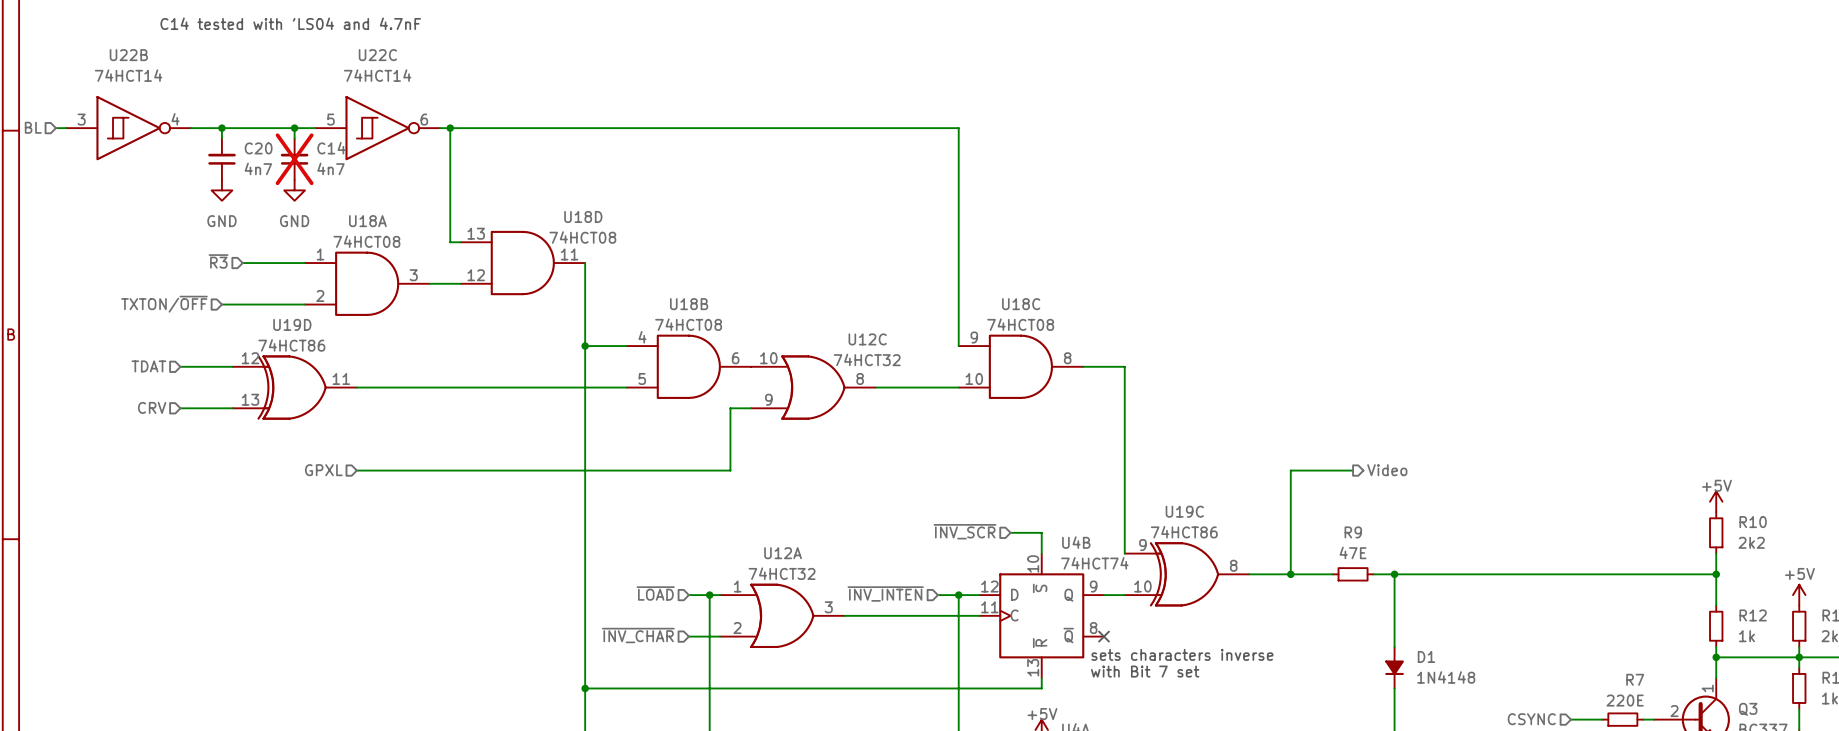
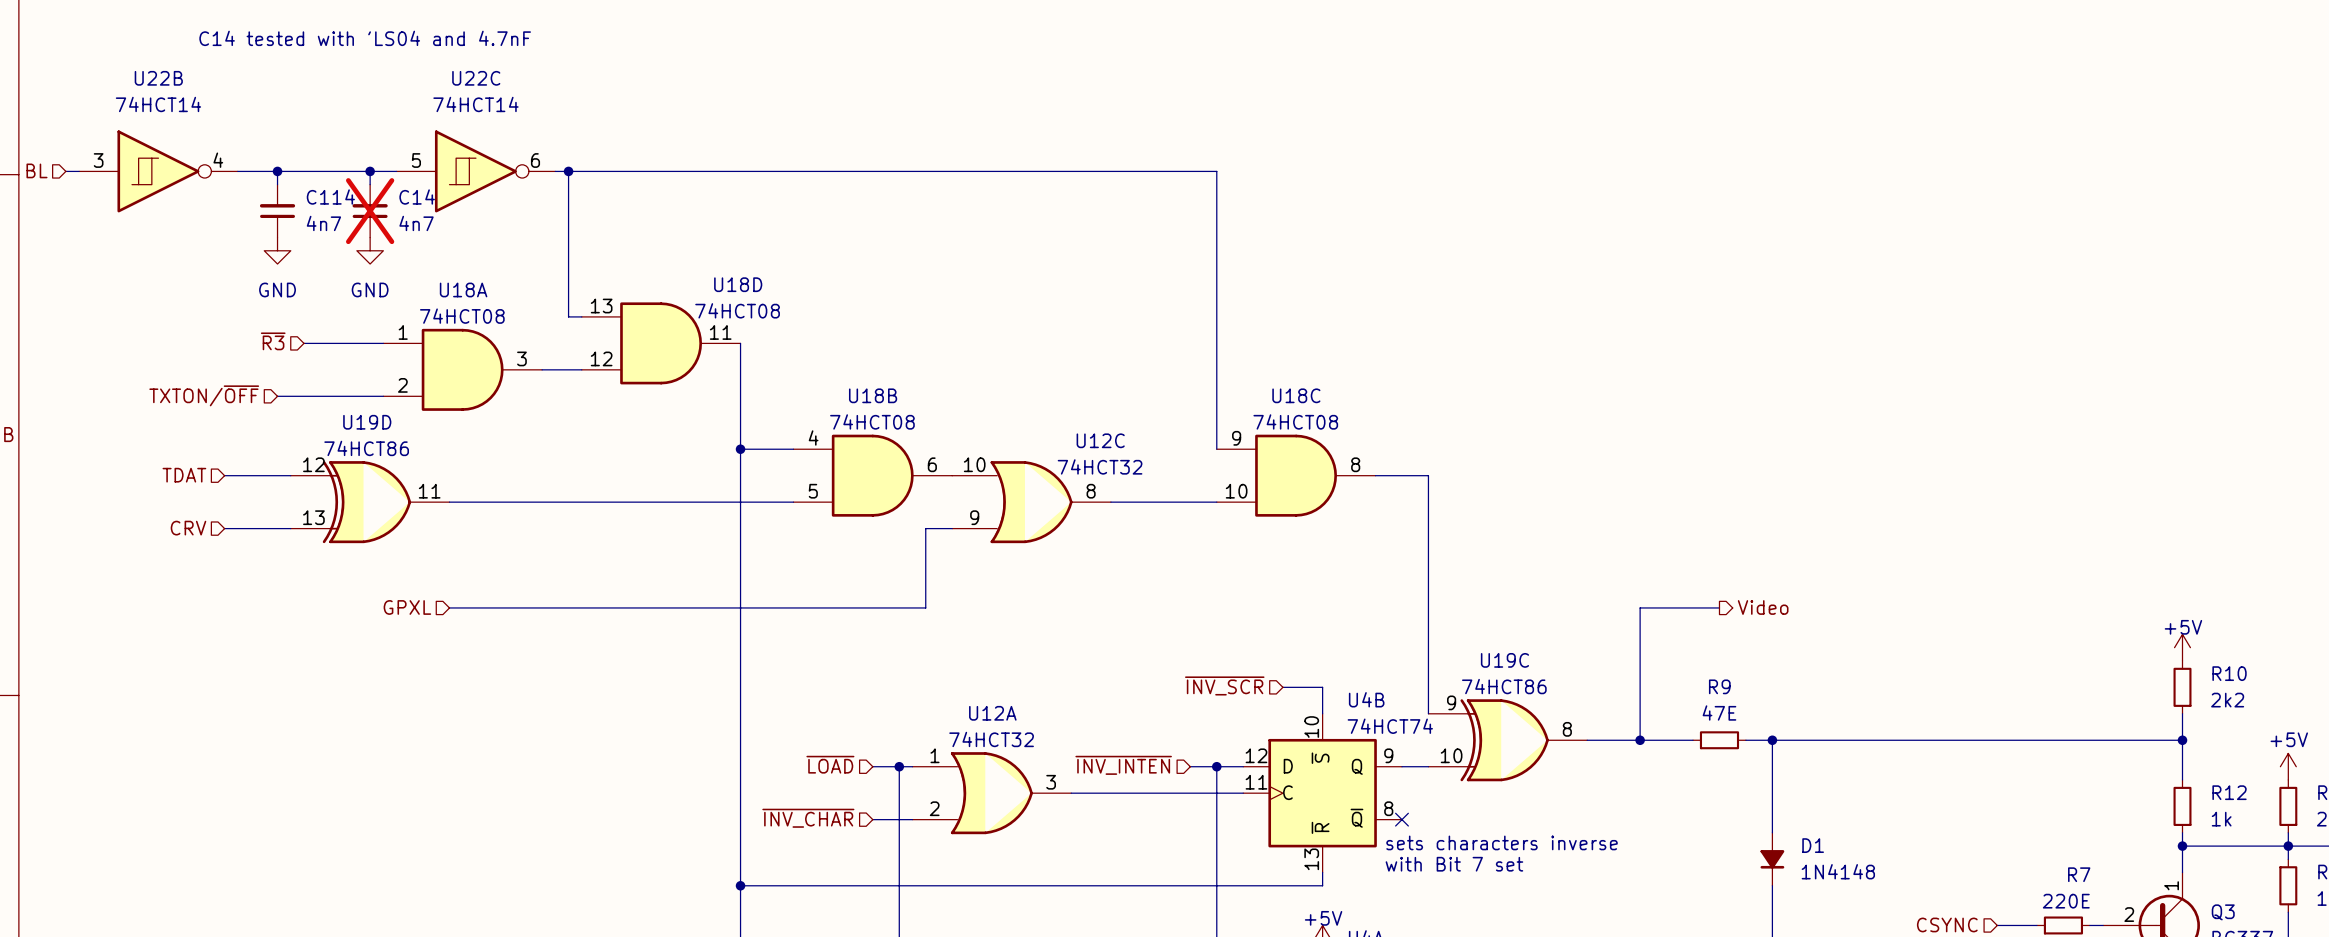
C20 name: C20 (258, 148) -> C114 (330, 197)

